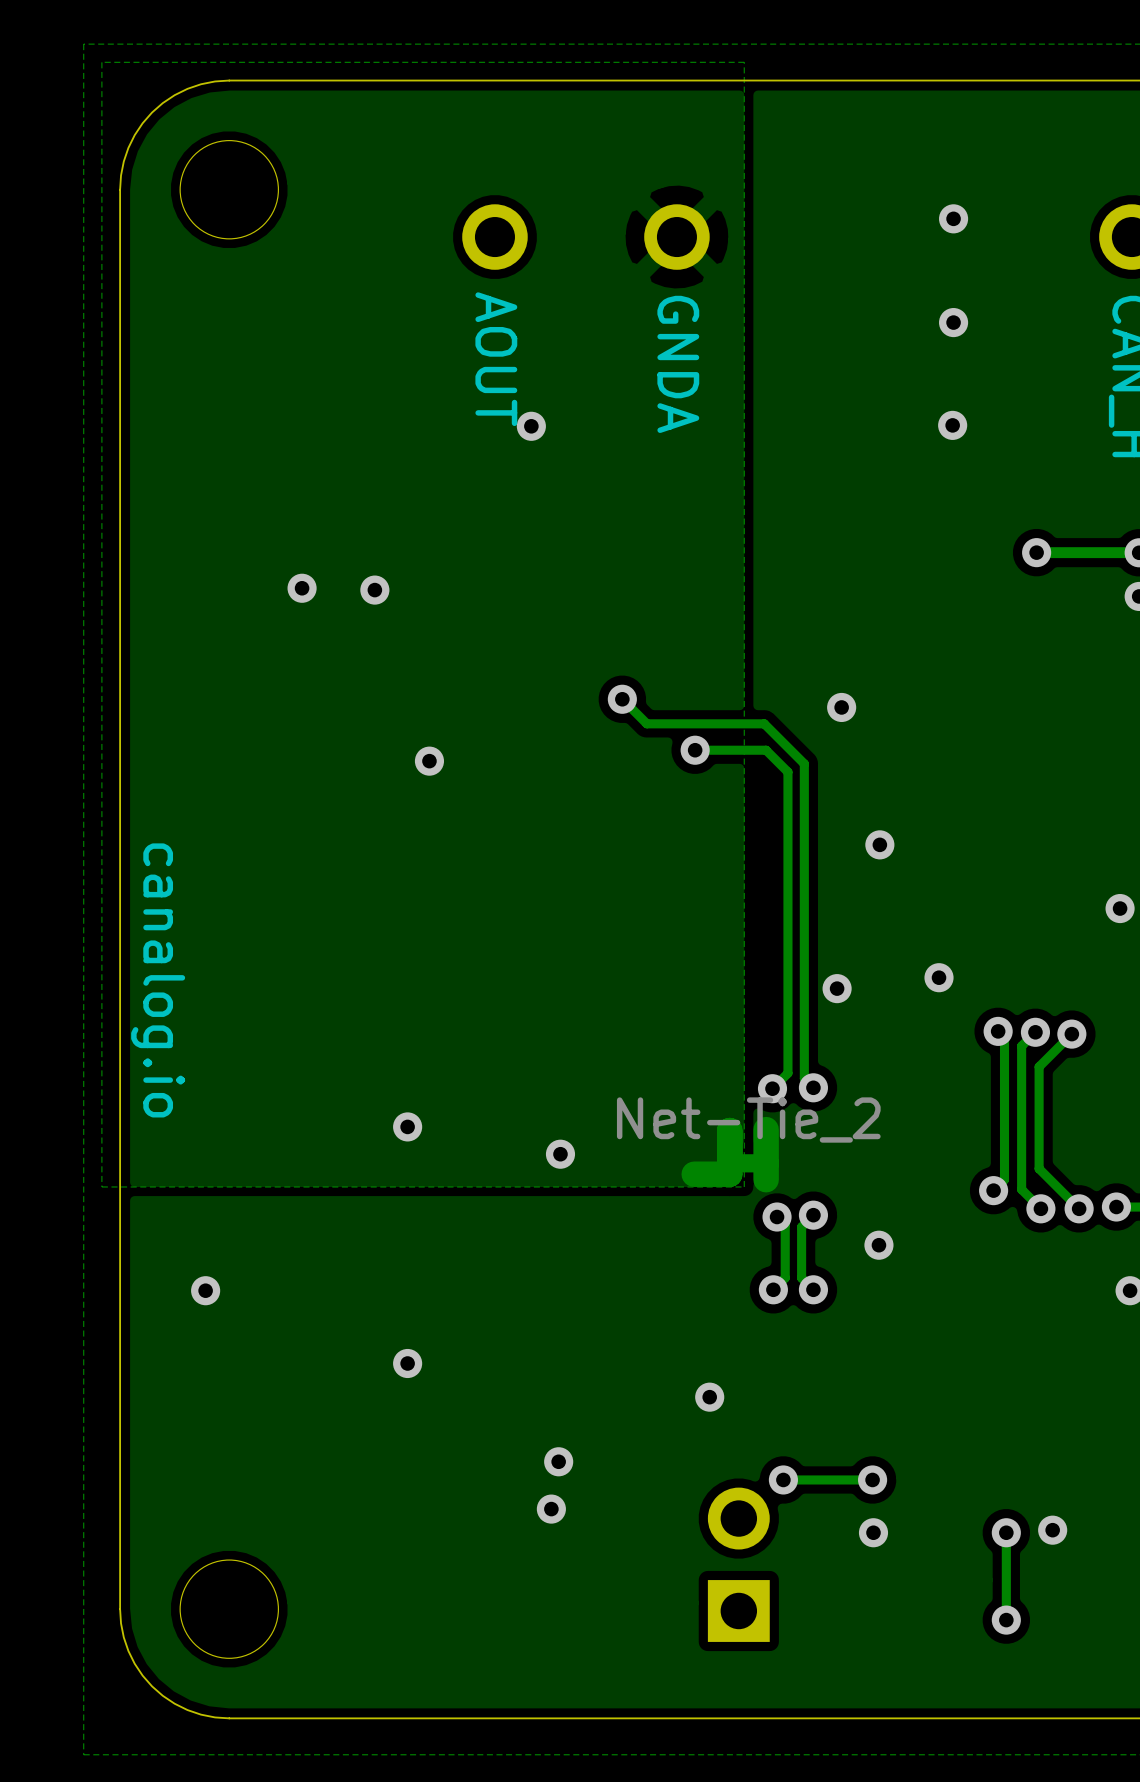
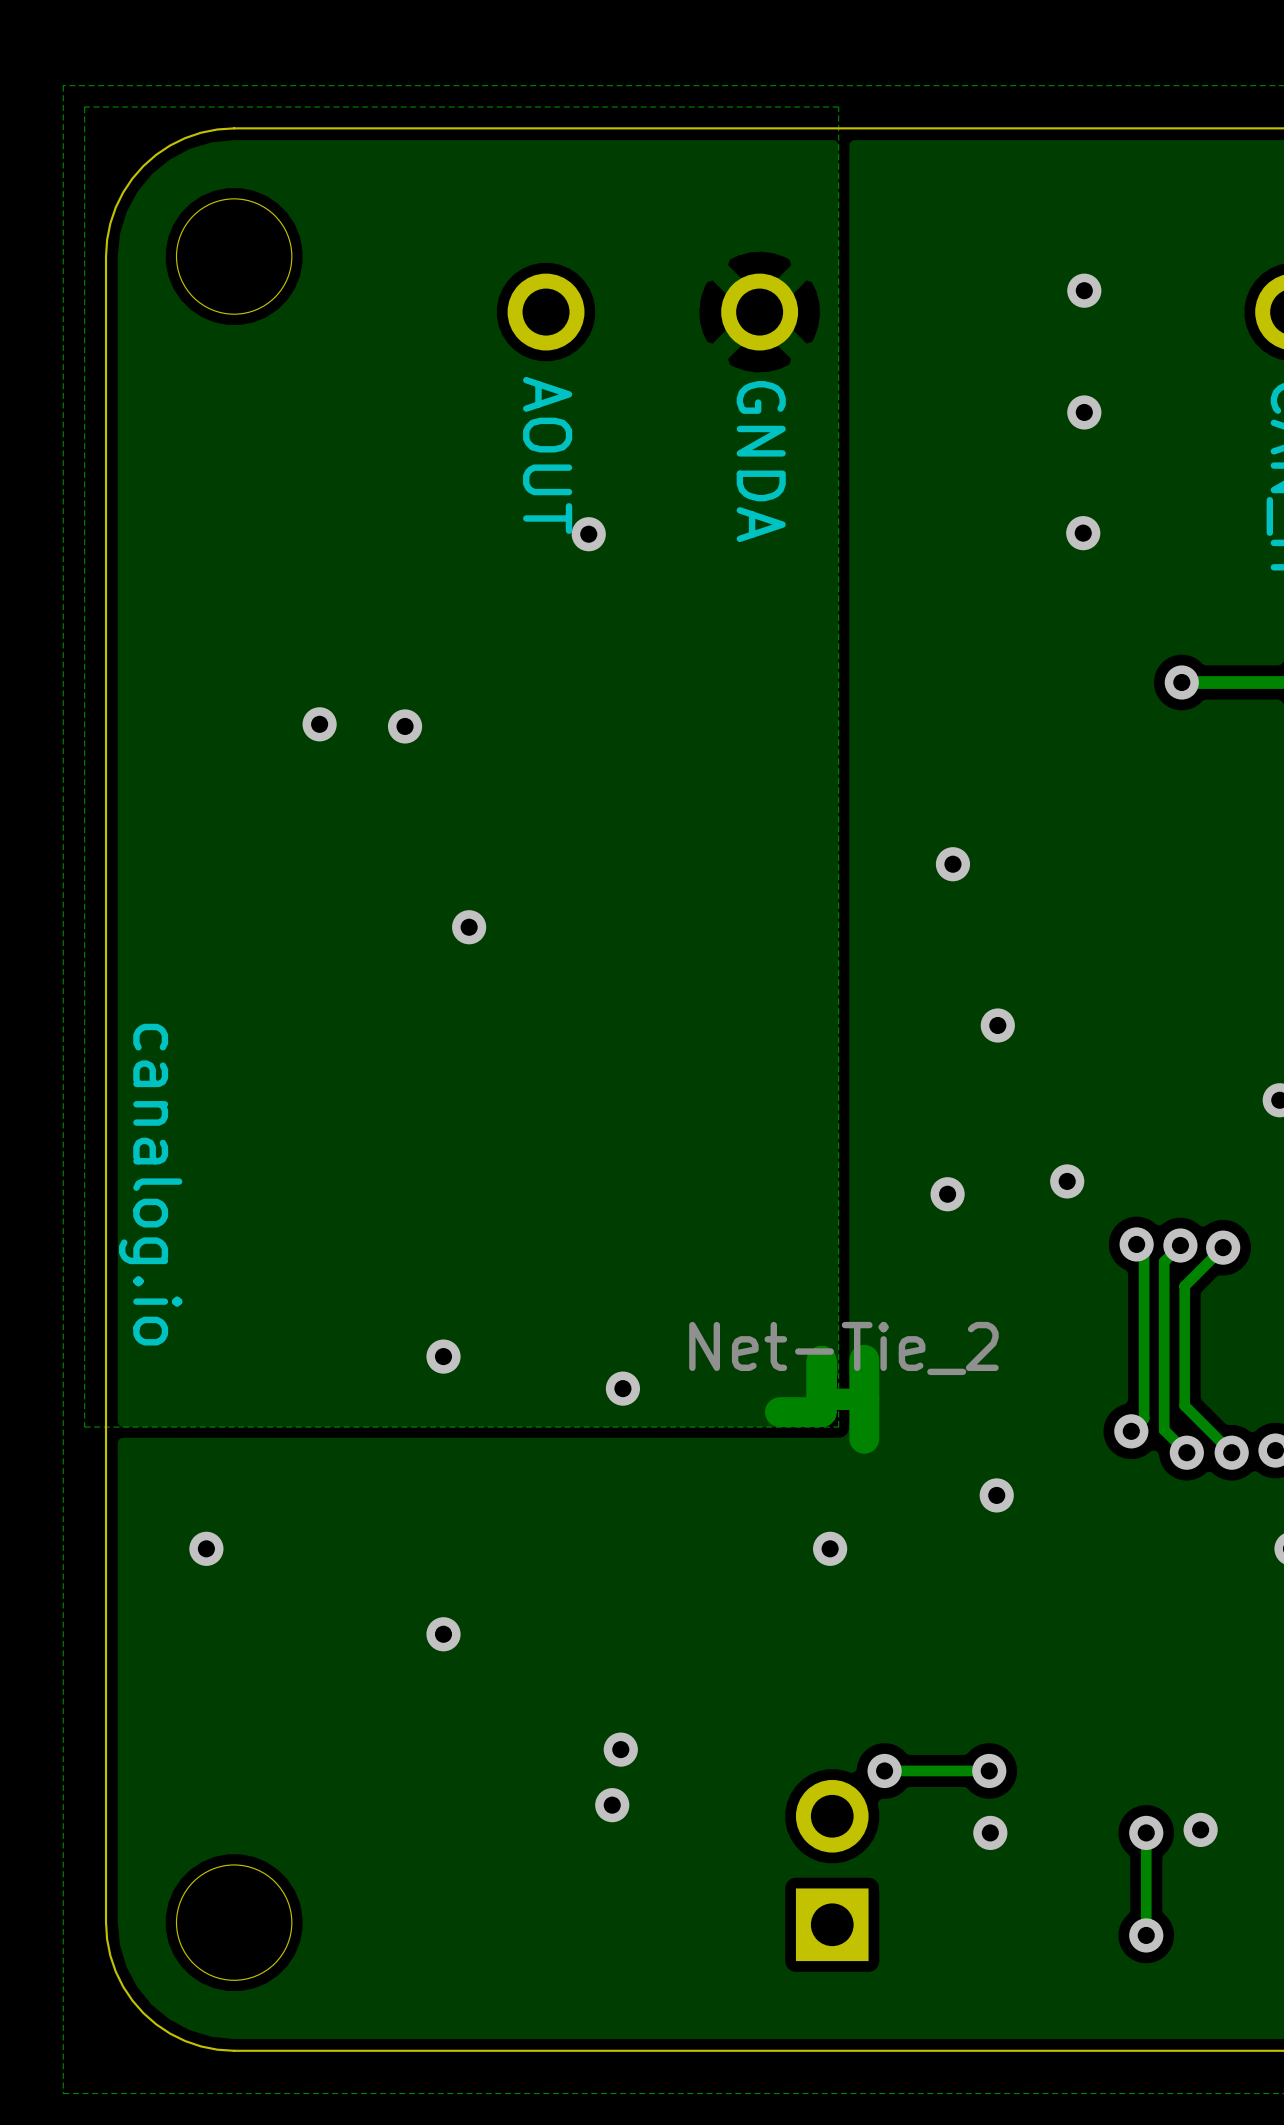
track: (622, 699) (646, 723) (764, 723) (804, 763) (804, 1078) (813, 1087) -> none
via: (622, 699) -> none
track: (695, 750) (766, 750) (787, 772) (787, 1073) (772, 1088) -> none
via: (695, 750) -> none
via: (813, 1087) -> none
via: (772, 1088) -> none
track: none -> (864, 1418) (864, 1438)
track: (813, 1215) (801, 1227) (801, 1277) (813, 1289) -> none
via: (813, 1215) -> none
track: (777, 1217) (785, 1225) (785, 1277) (773, 1289) -> none
via: (777, 1217) -> none
via position: (773, 1289) -> (830, 1548)
via: (813, 1289) -> none
via: (709, 1397) -> none

